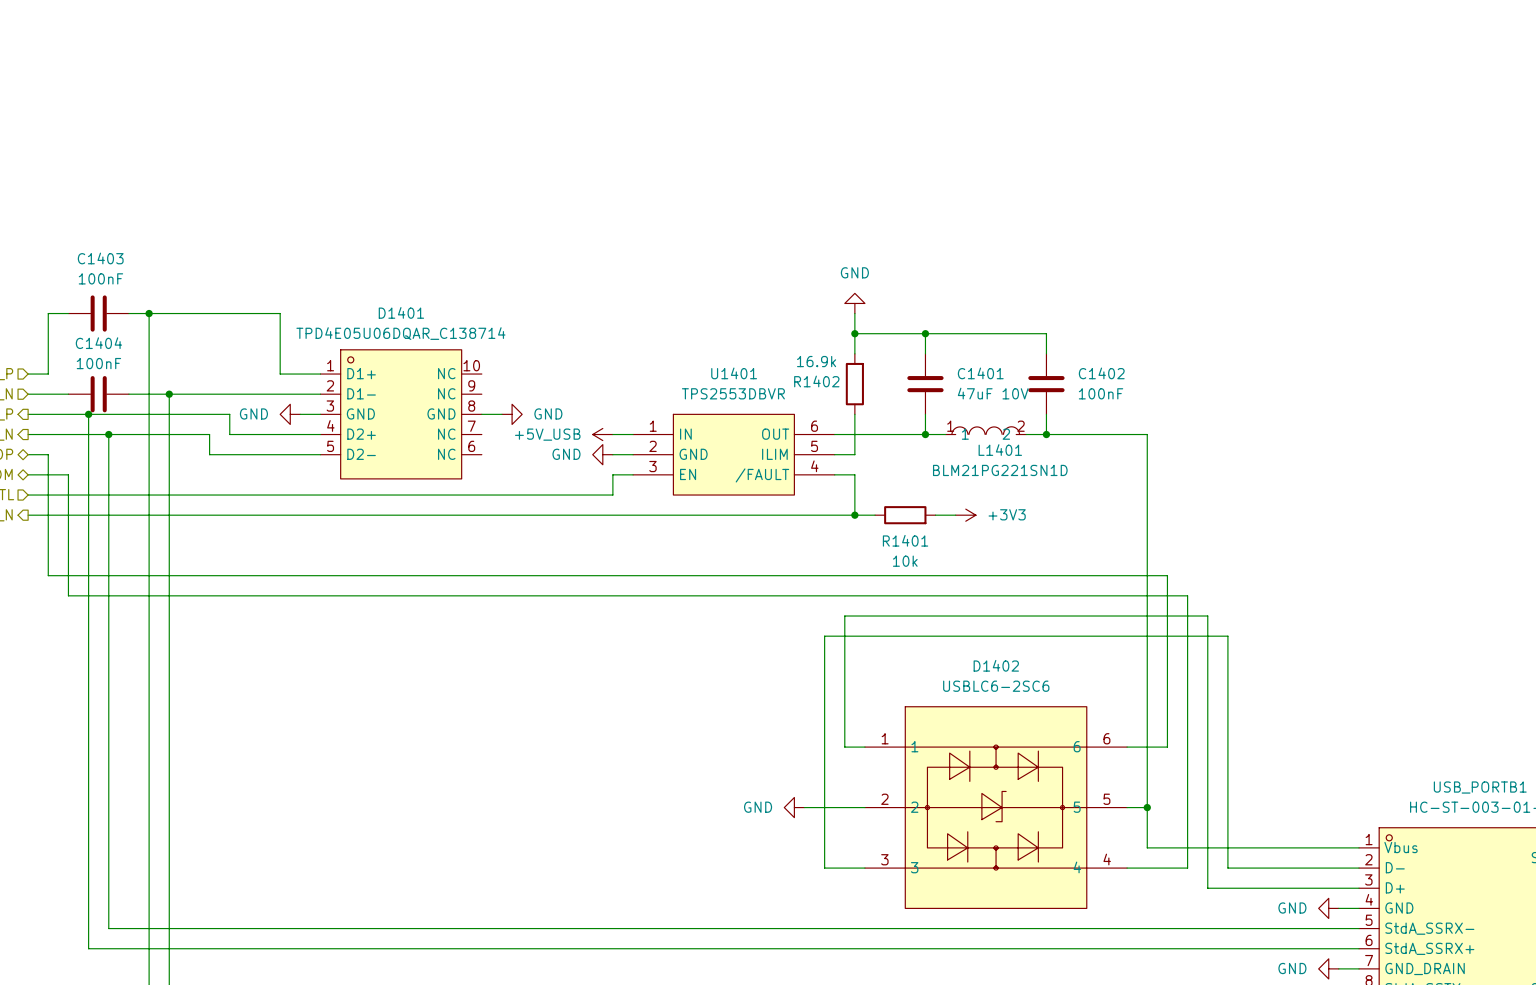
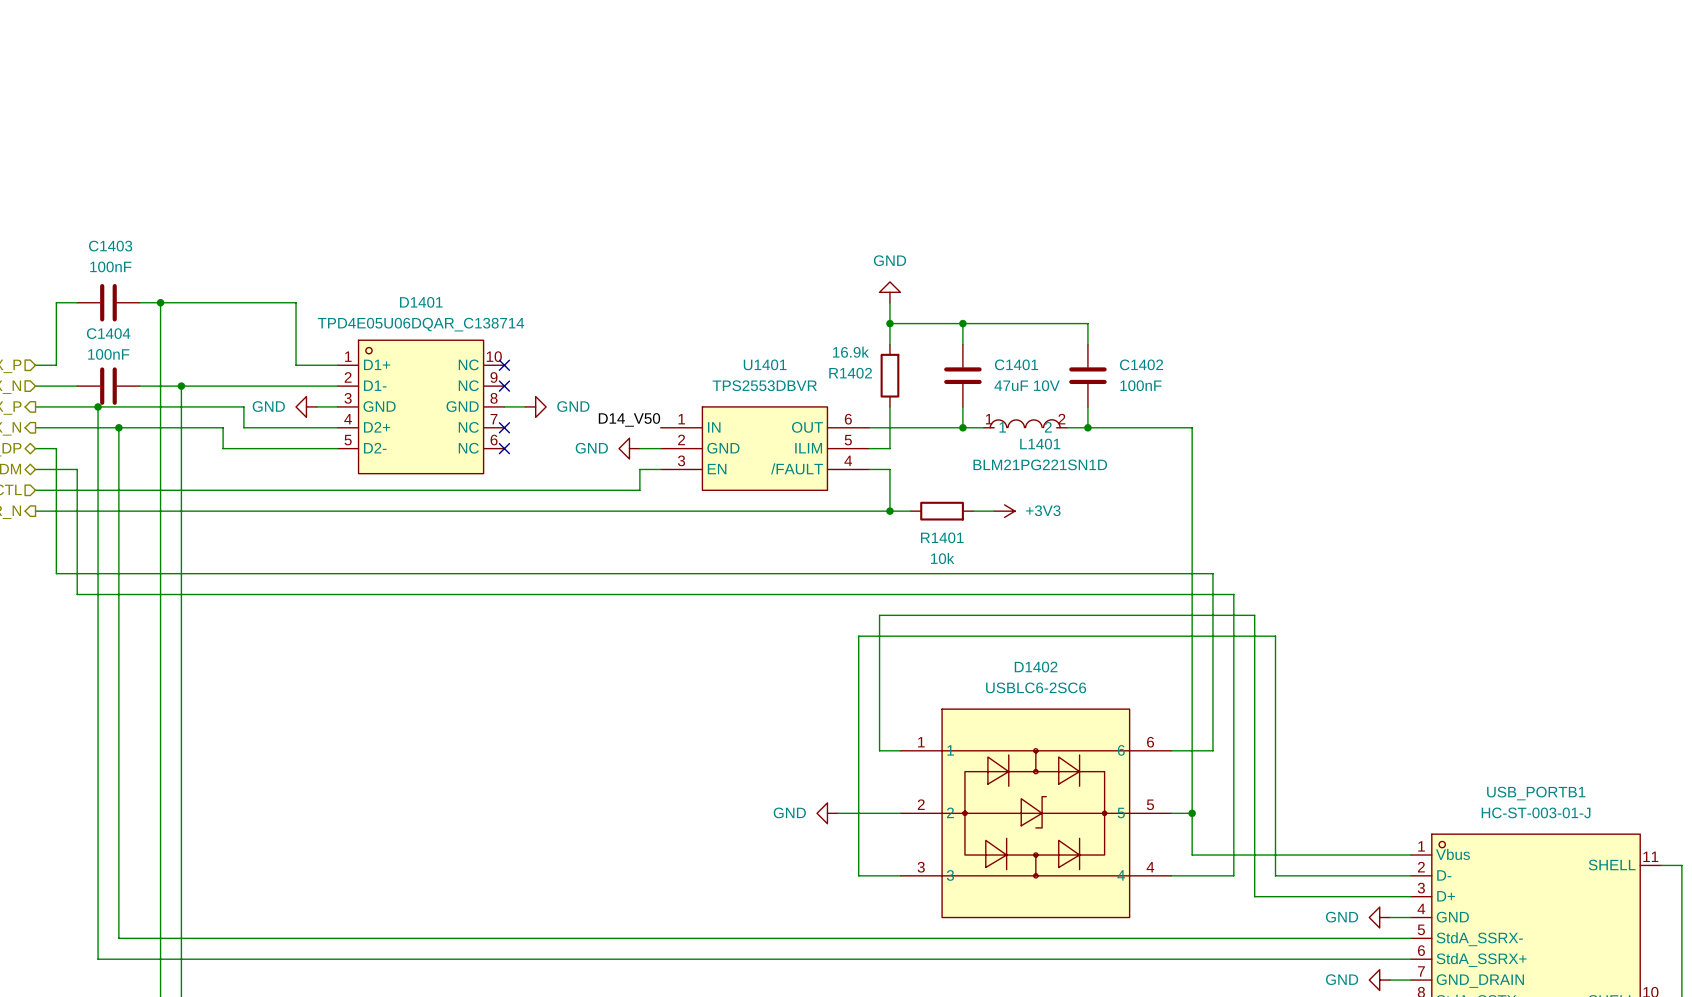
no-connect mark: none -> (504, 365)
no-connect mark: none -> (504, 386)
label: none -> D14_V50 (629, 419)
no-connect mark: none -> (504, 427)
power symbol: +5V_USB (602, 434) -> none
wire: (612, 434) (633, 434) -> none
no-connect mark: none -> (504, 448)

